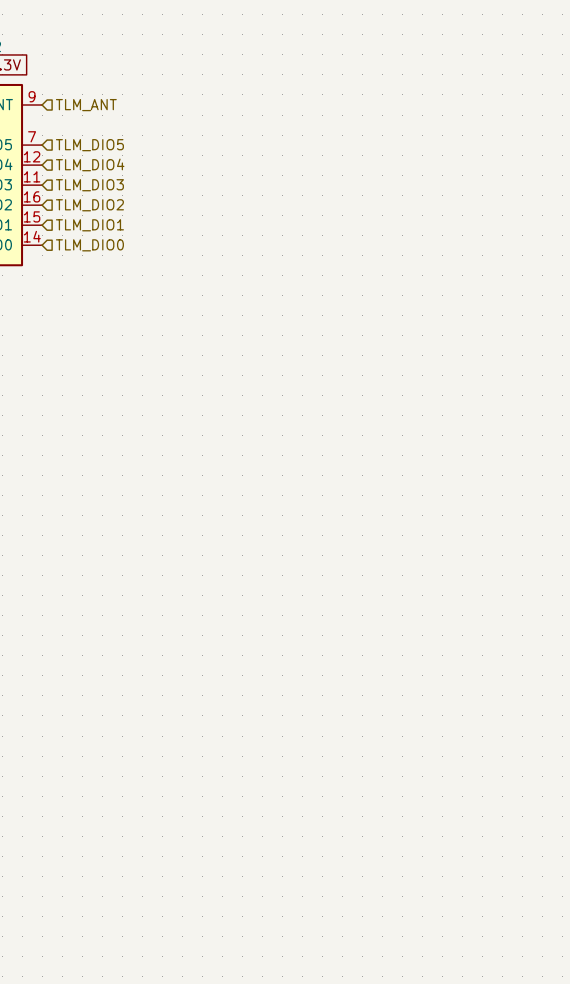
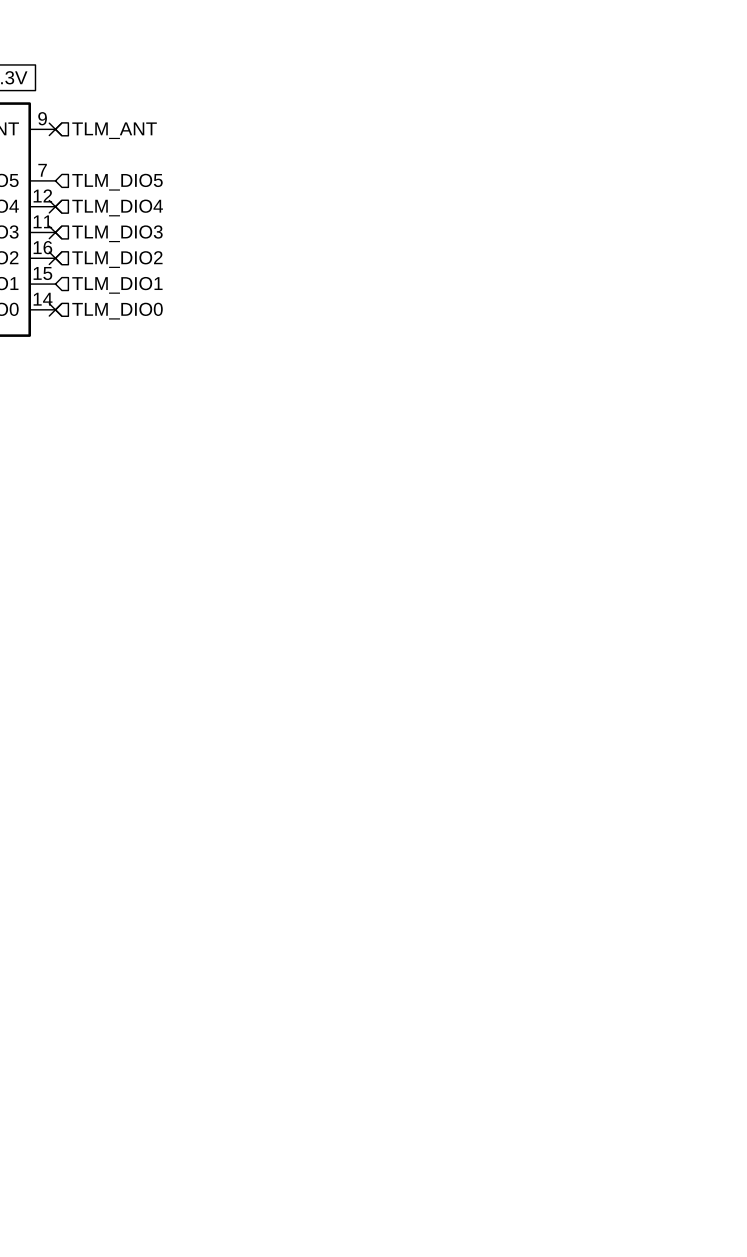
no-connect mark: none -> (55, 129)
no-connect mark: none -> (55, 206)
no-connect mark: none -> (55, 232)
no-connect mark: none -> (55, 258)
no-connect mark: none -> (55, 309)

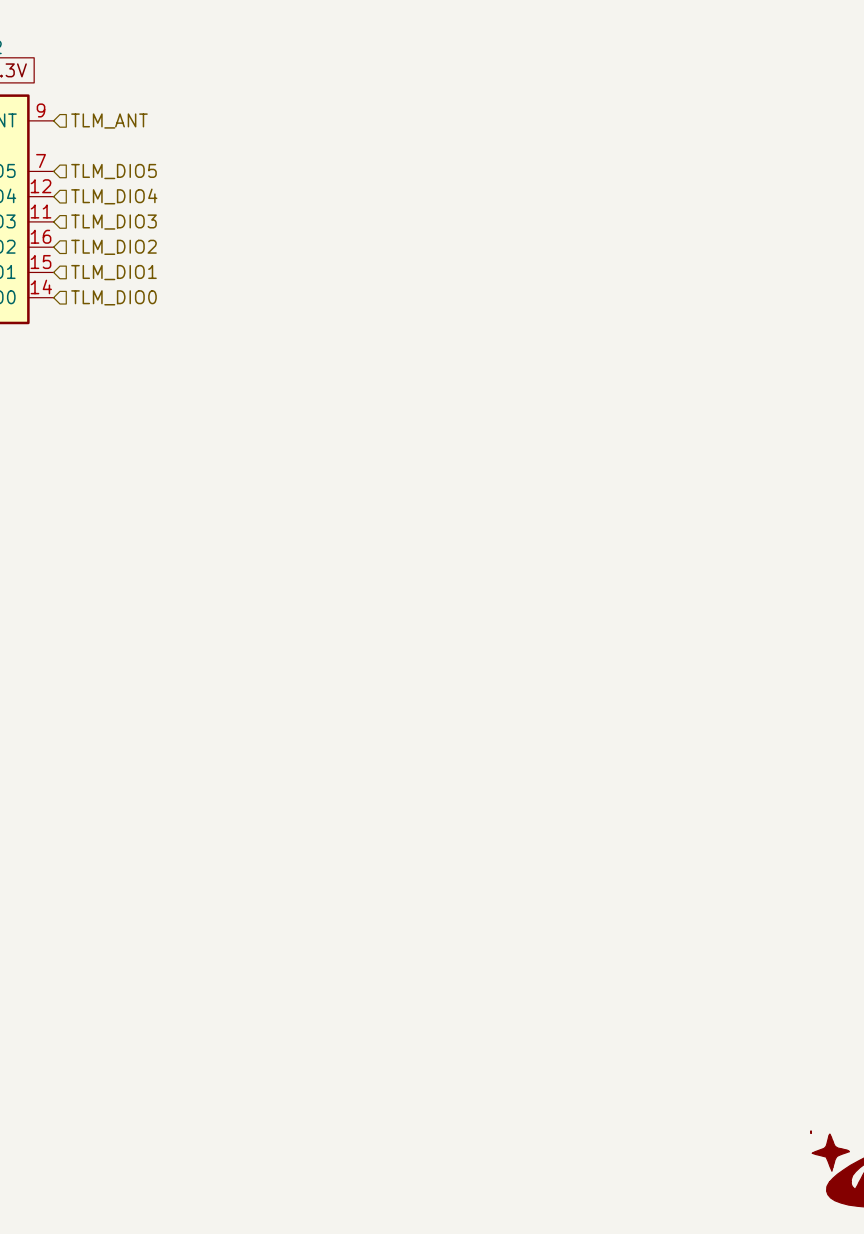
no-connect mark: (55, 129) -> none
no-connect mark: (55, 206) -> none
no-connect mark: (55, 232) -> none
no-connect mark: (55, 258) -> none
no-connect mark: (55, 309) -> none

